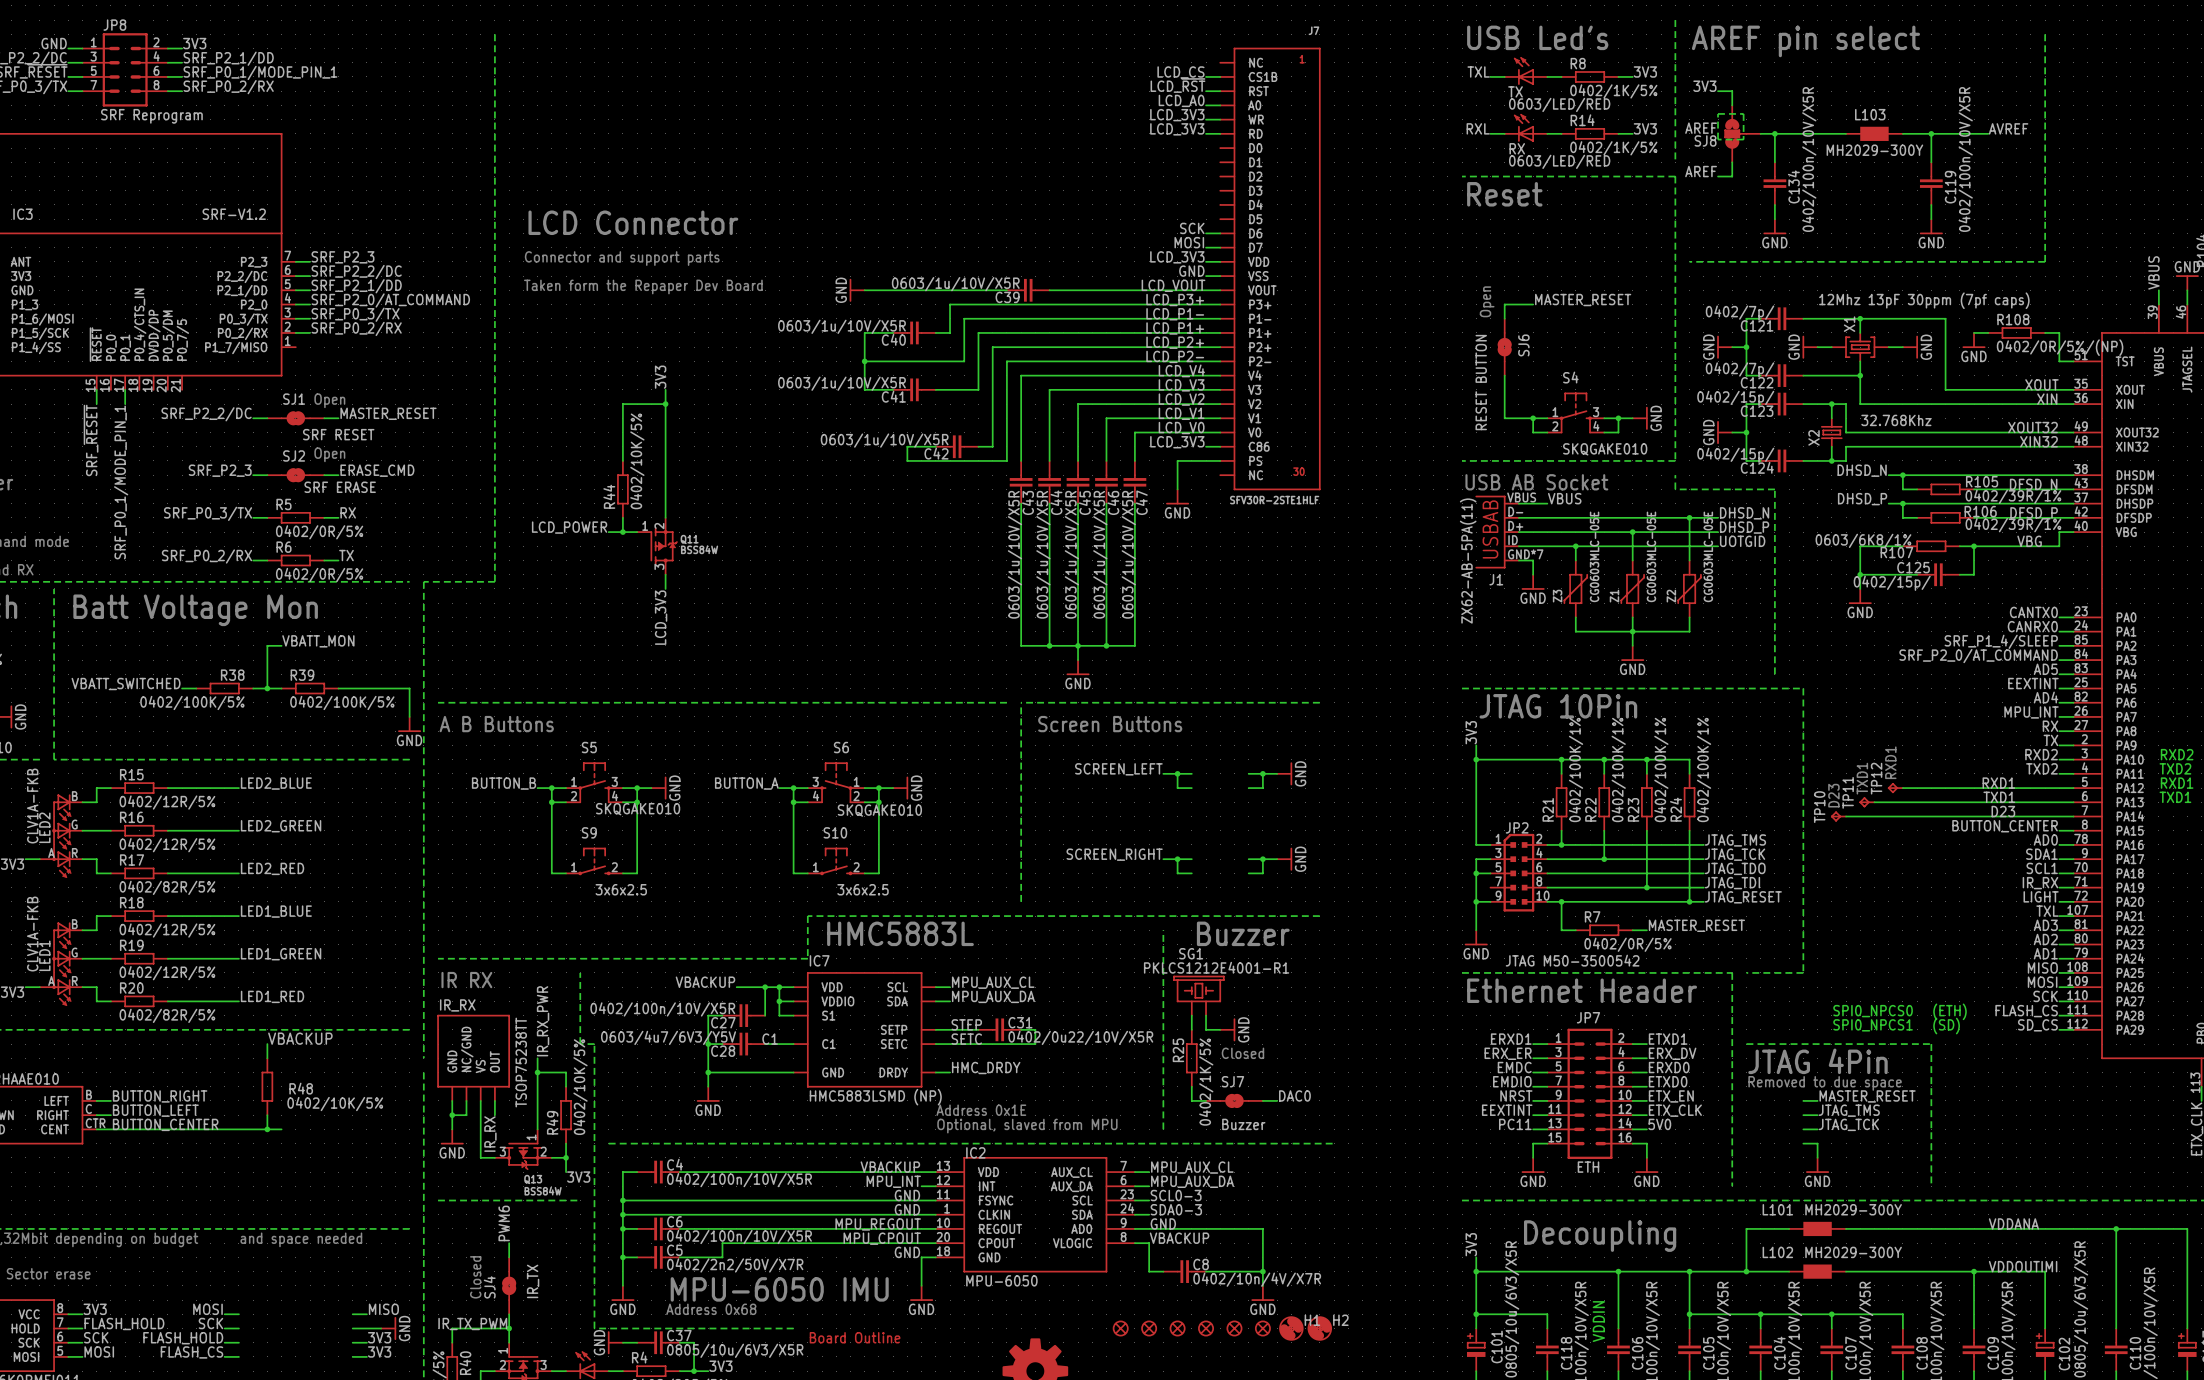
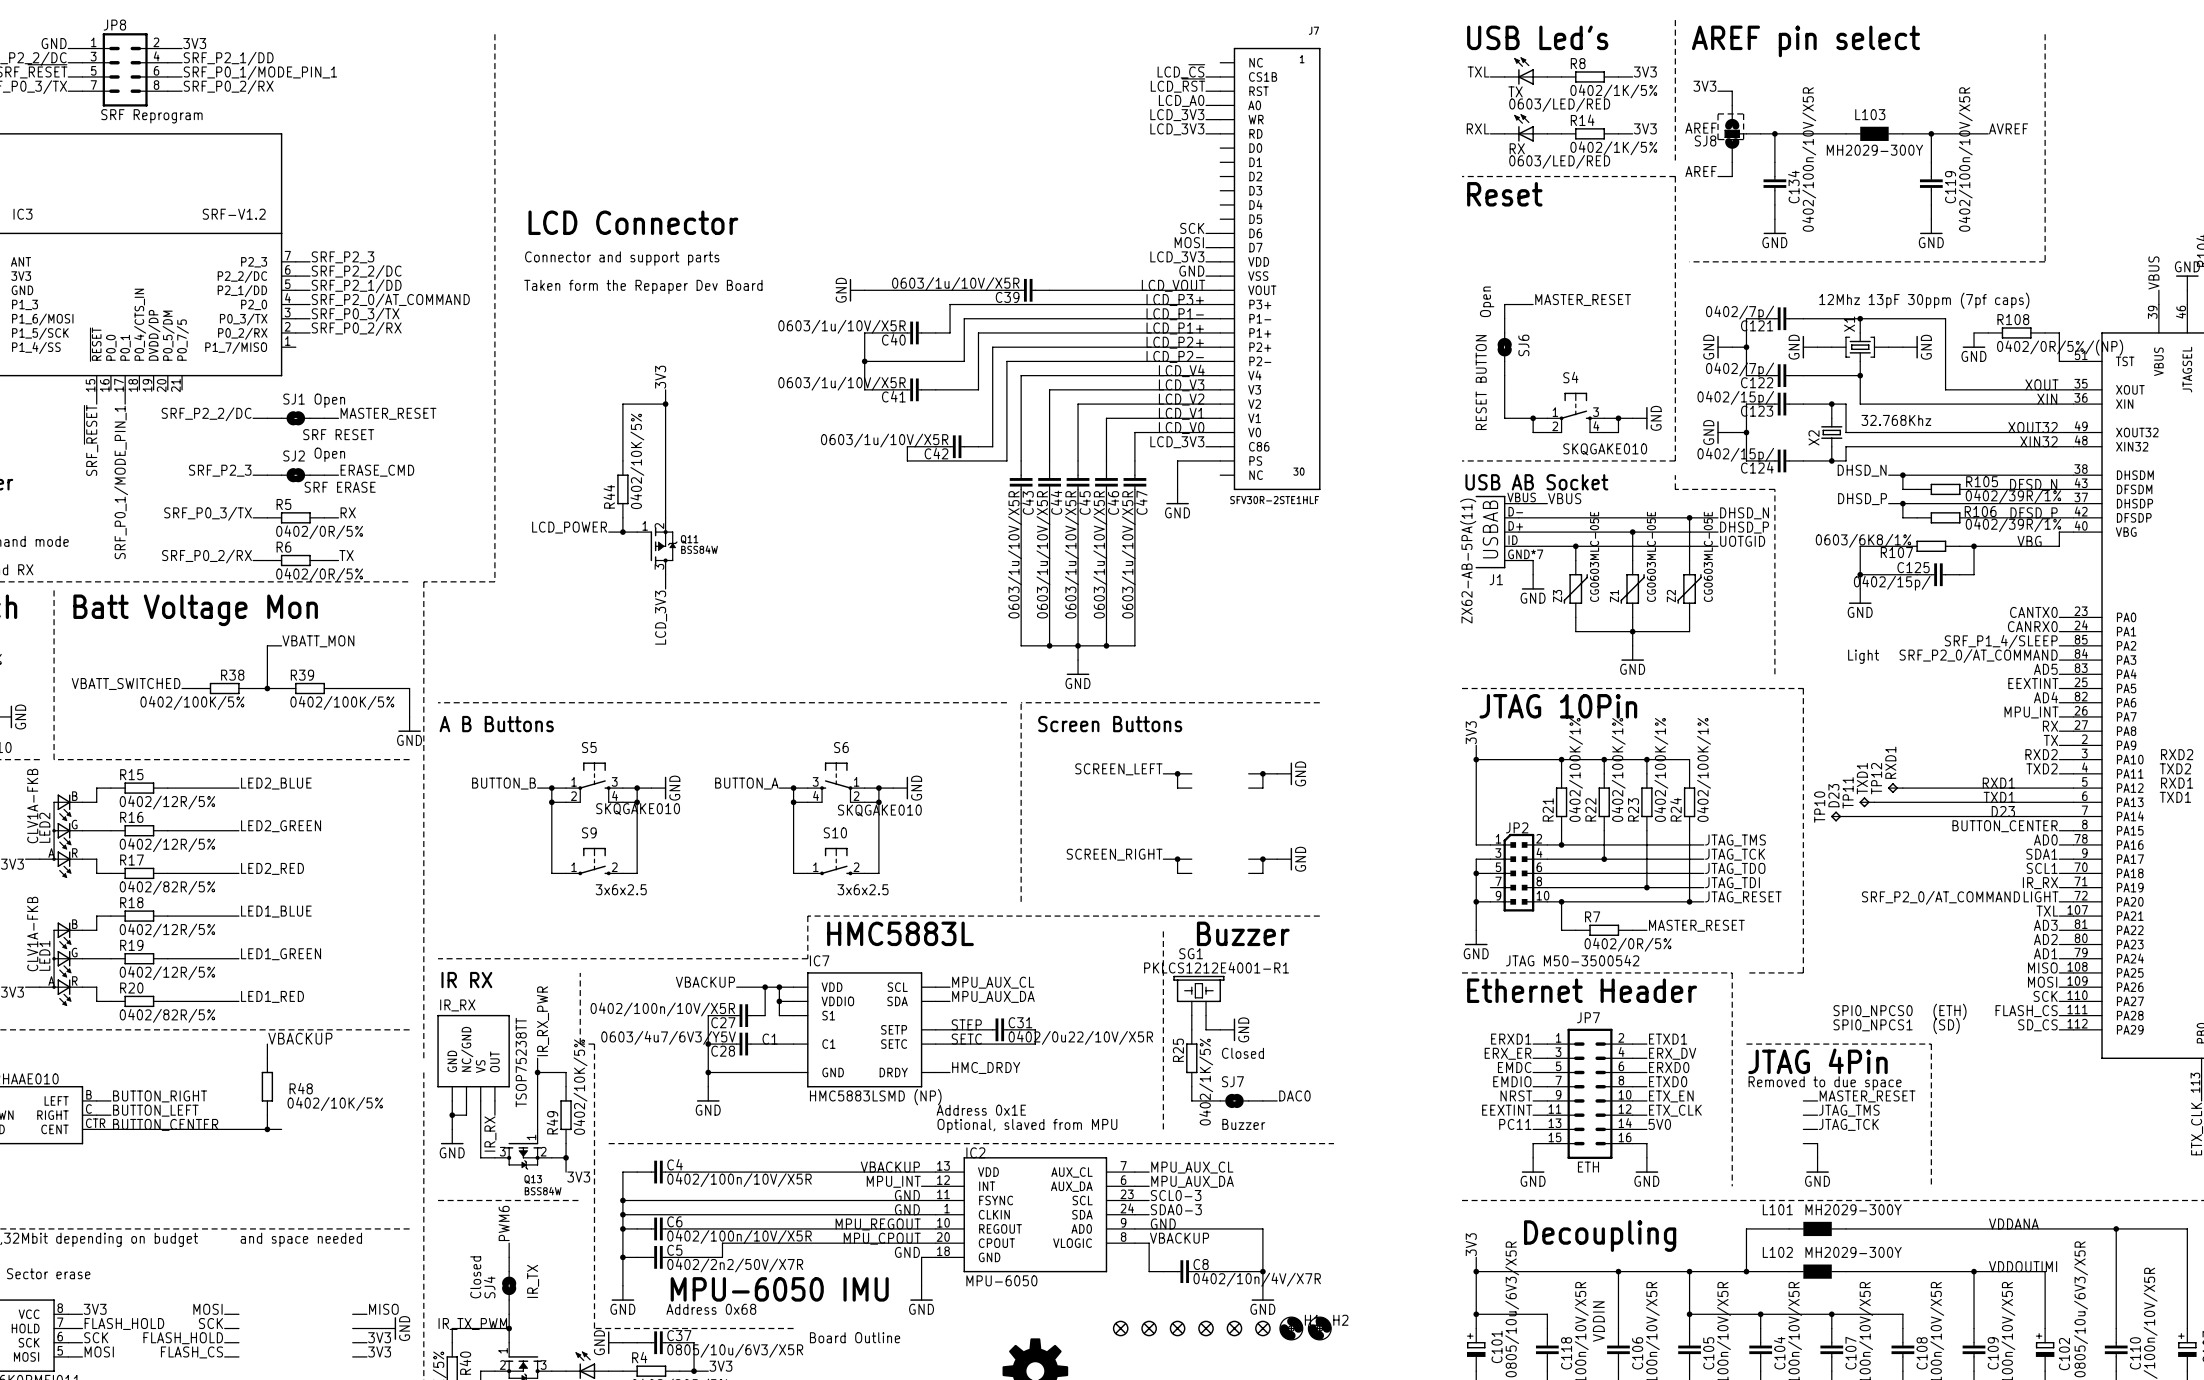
label: LCD_CS (1180, 72) -> LCD_~{CS} (1181, 71)
text: none -> Light (1863, 656)
text: none -> SRF_P2_0/AT_COMMAND (1940, 897)

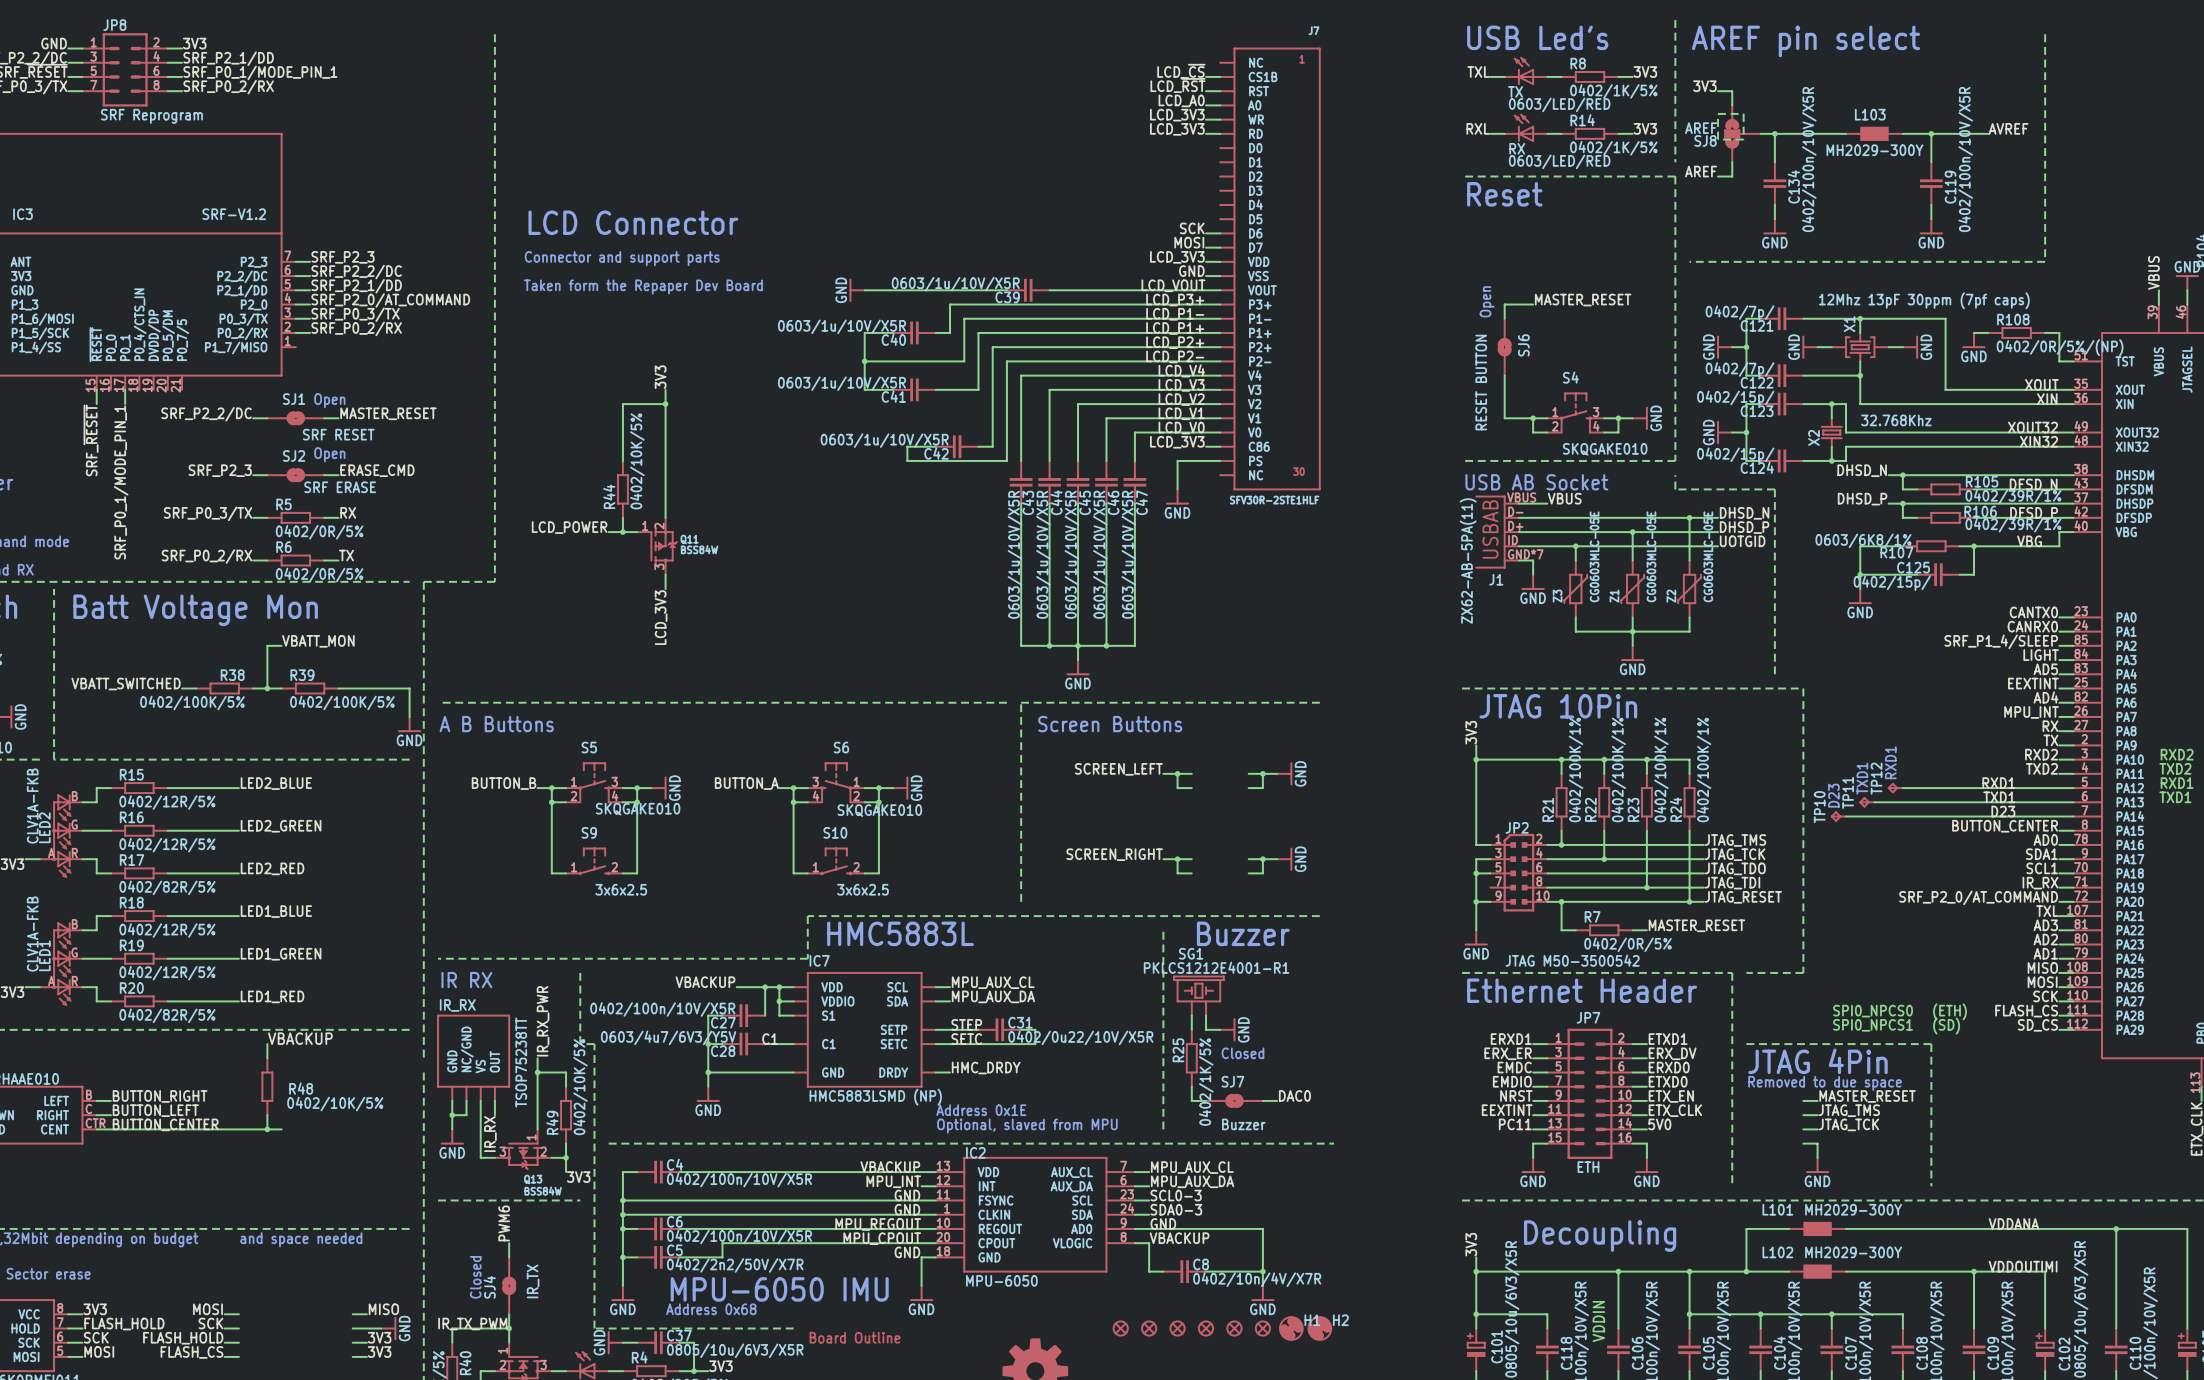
text: Light (1863, 656) -> none
label: SRF_P2_0/AT_COMMAND (1978, 656) -> LIGHT (2041, 655)
label: LIGHT (2041, 896) -> SRF_P2_0/AT_COMMAND (1978, 897)
text: SRF_P2_0/AT_COMMAND (1940, 897) -> none

